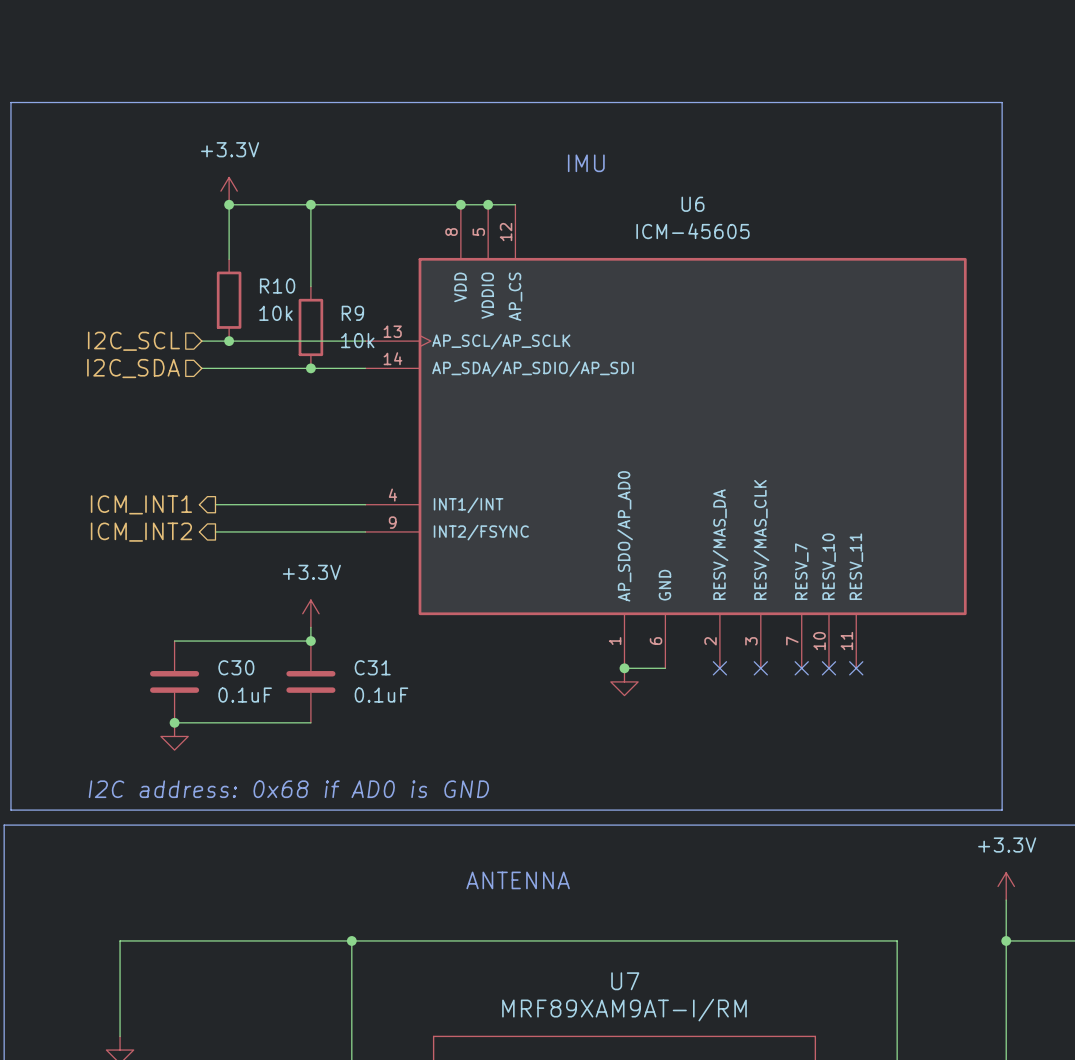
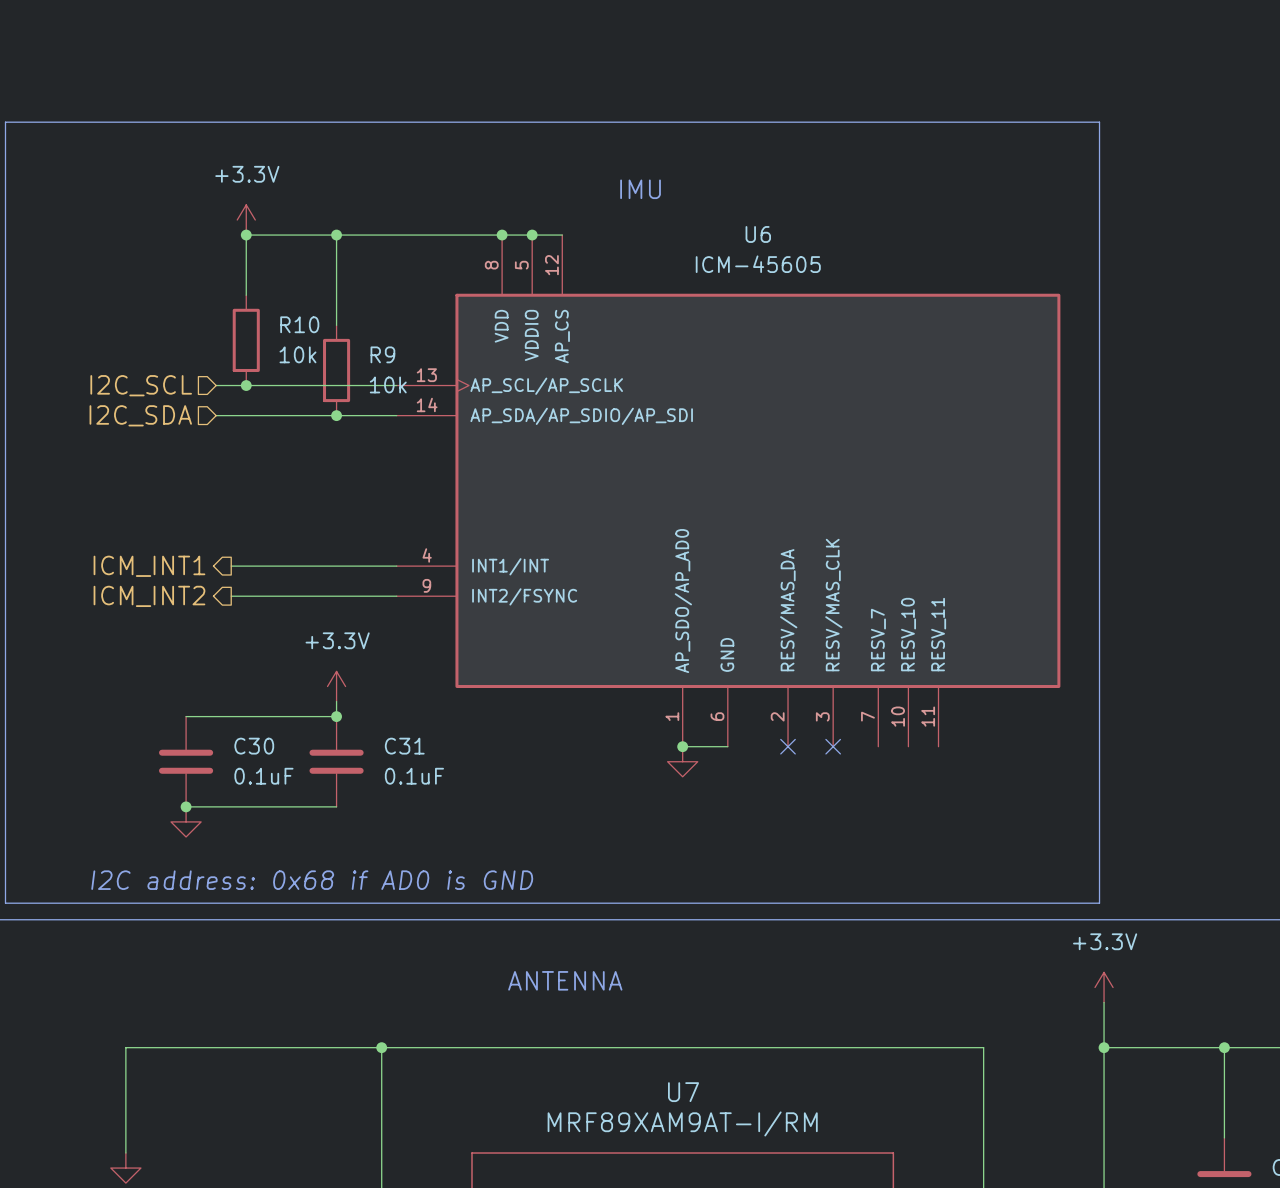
no-connect mark: (801, 668) -> none
no-connect mark: (828, 668) -> none
no-connect mark: (856, 668) -> none

